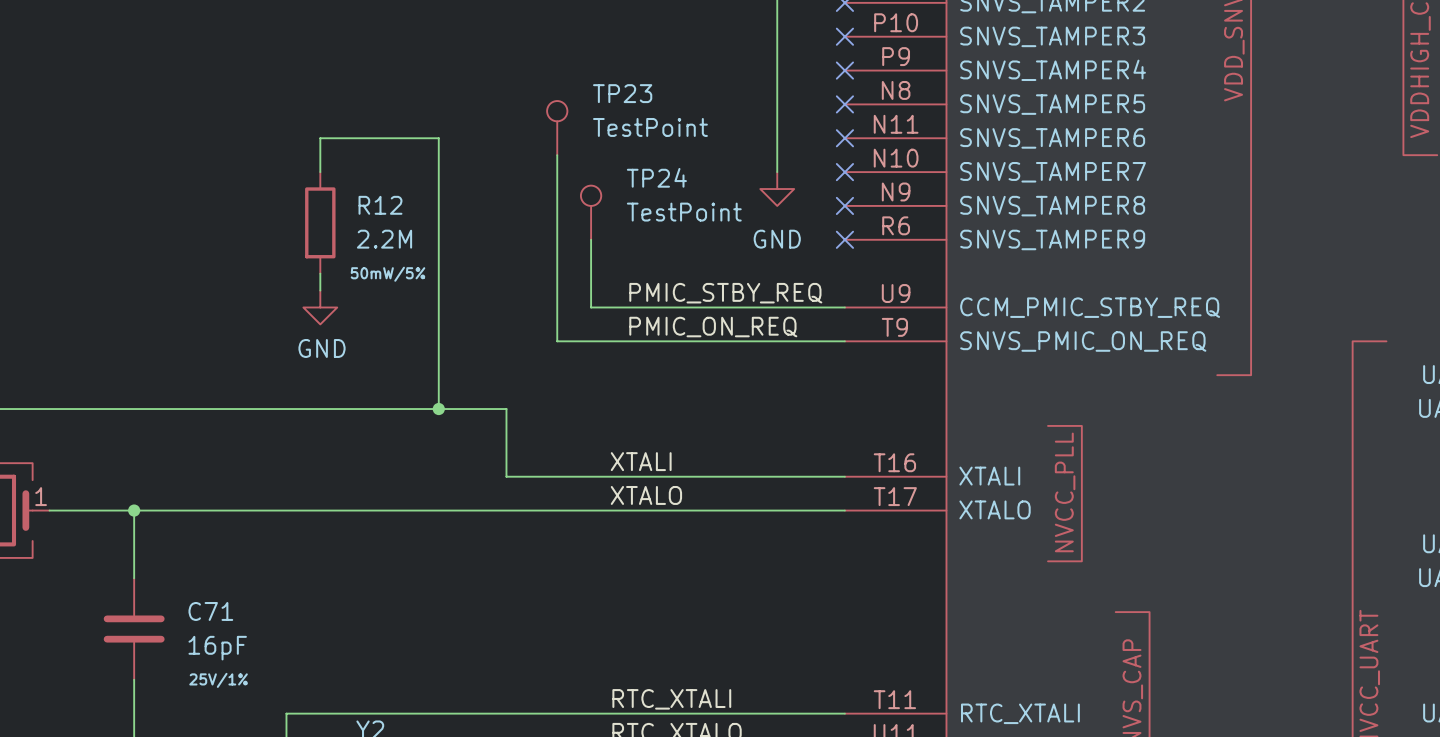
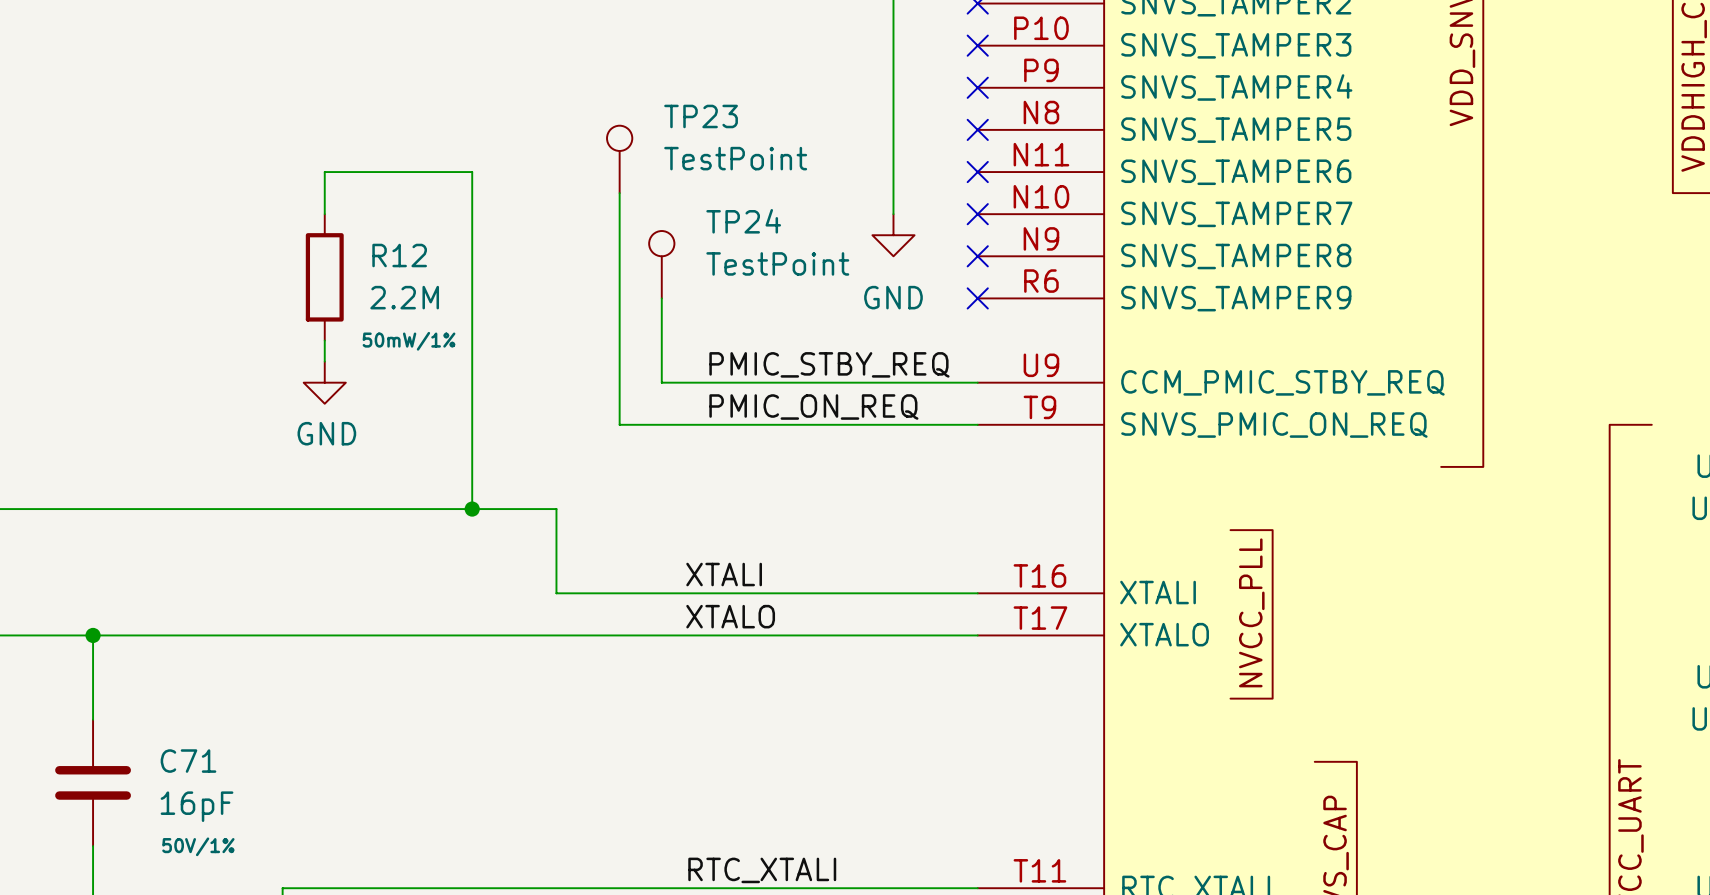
R12 text: 50mW/5% (388, 274) -> 50mW/1% (409, 341)
C71 text: 25V/1% (218, 680) -> 50V/1% (198, 846)

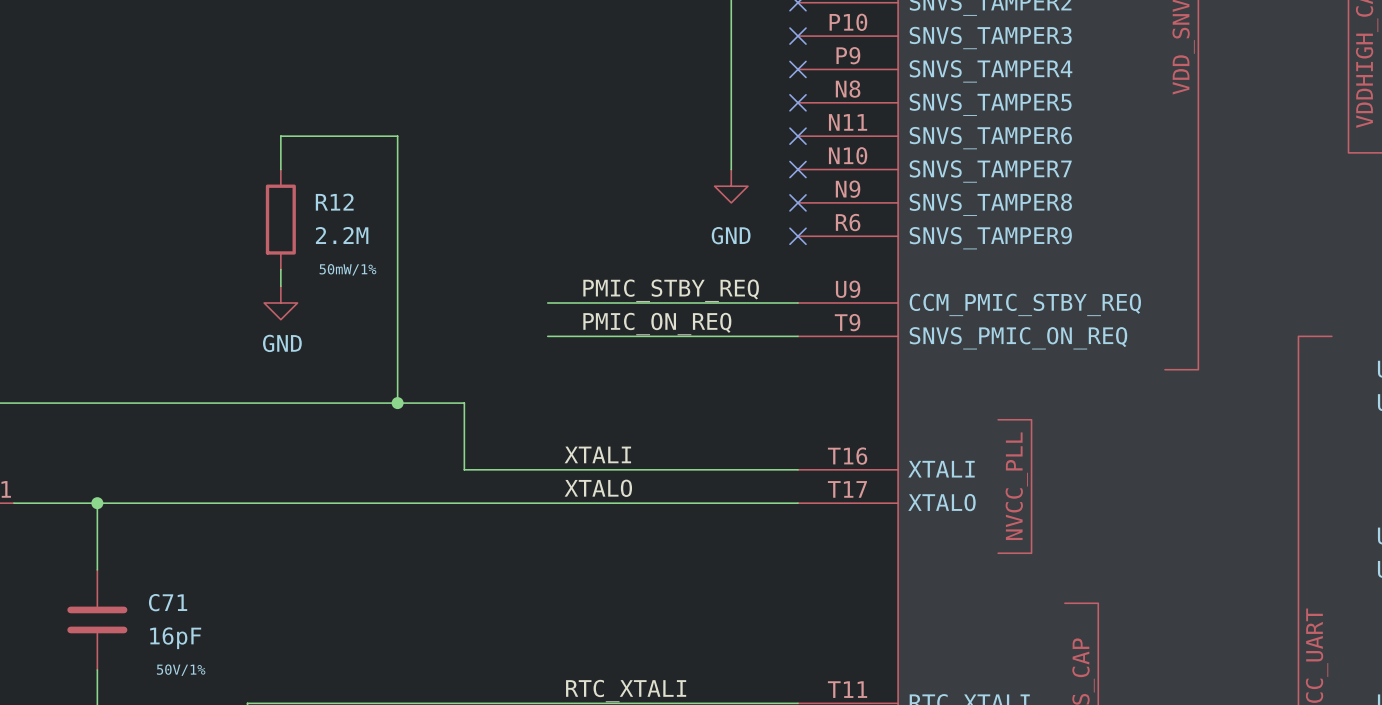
TP23: TestPoint (619, 159) -> none
wire: (619, 193) (619, 424) (661, 424) -> none
TP24: TestPoint (661, 264) -> none
wire: (661, 298) (661, 382) -> none

